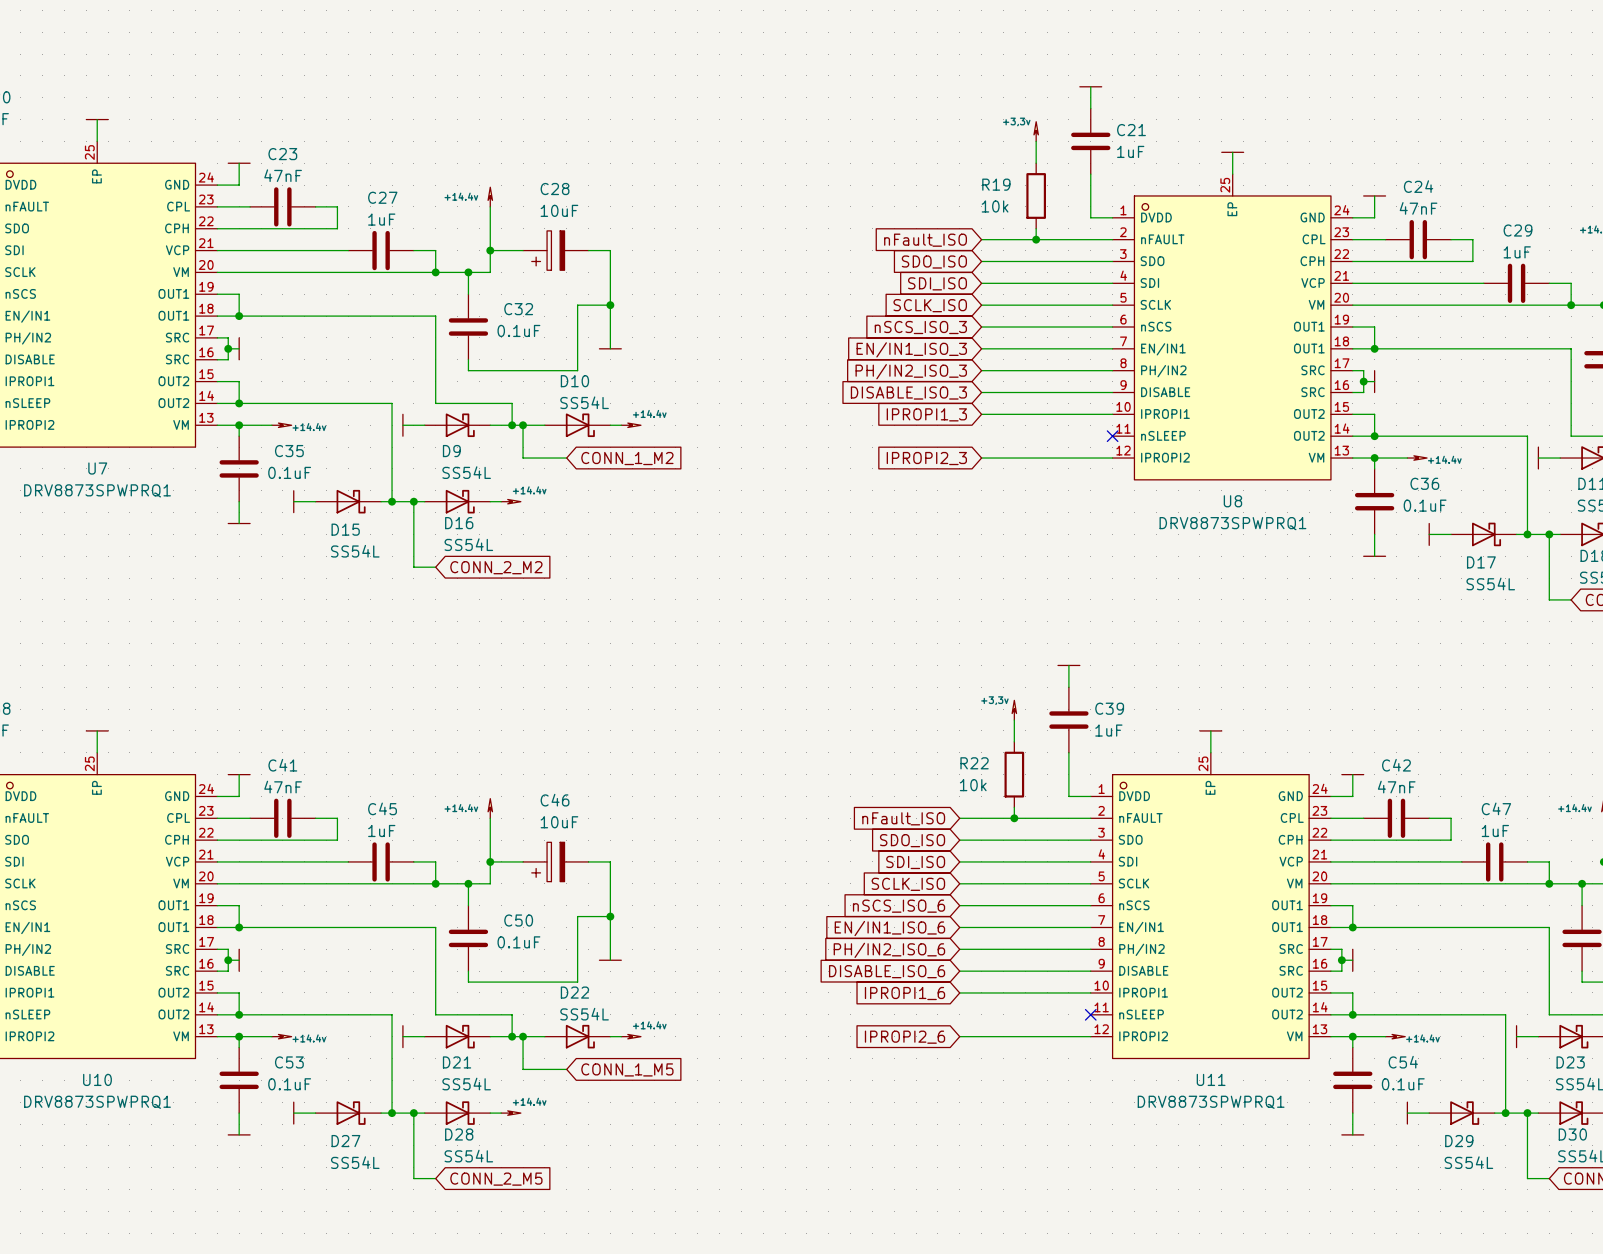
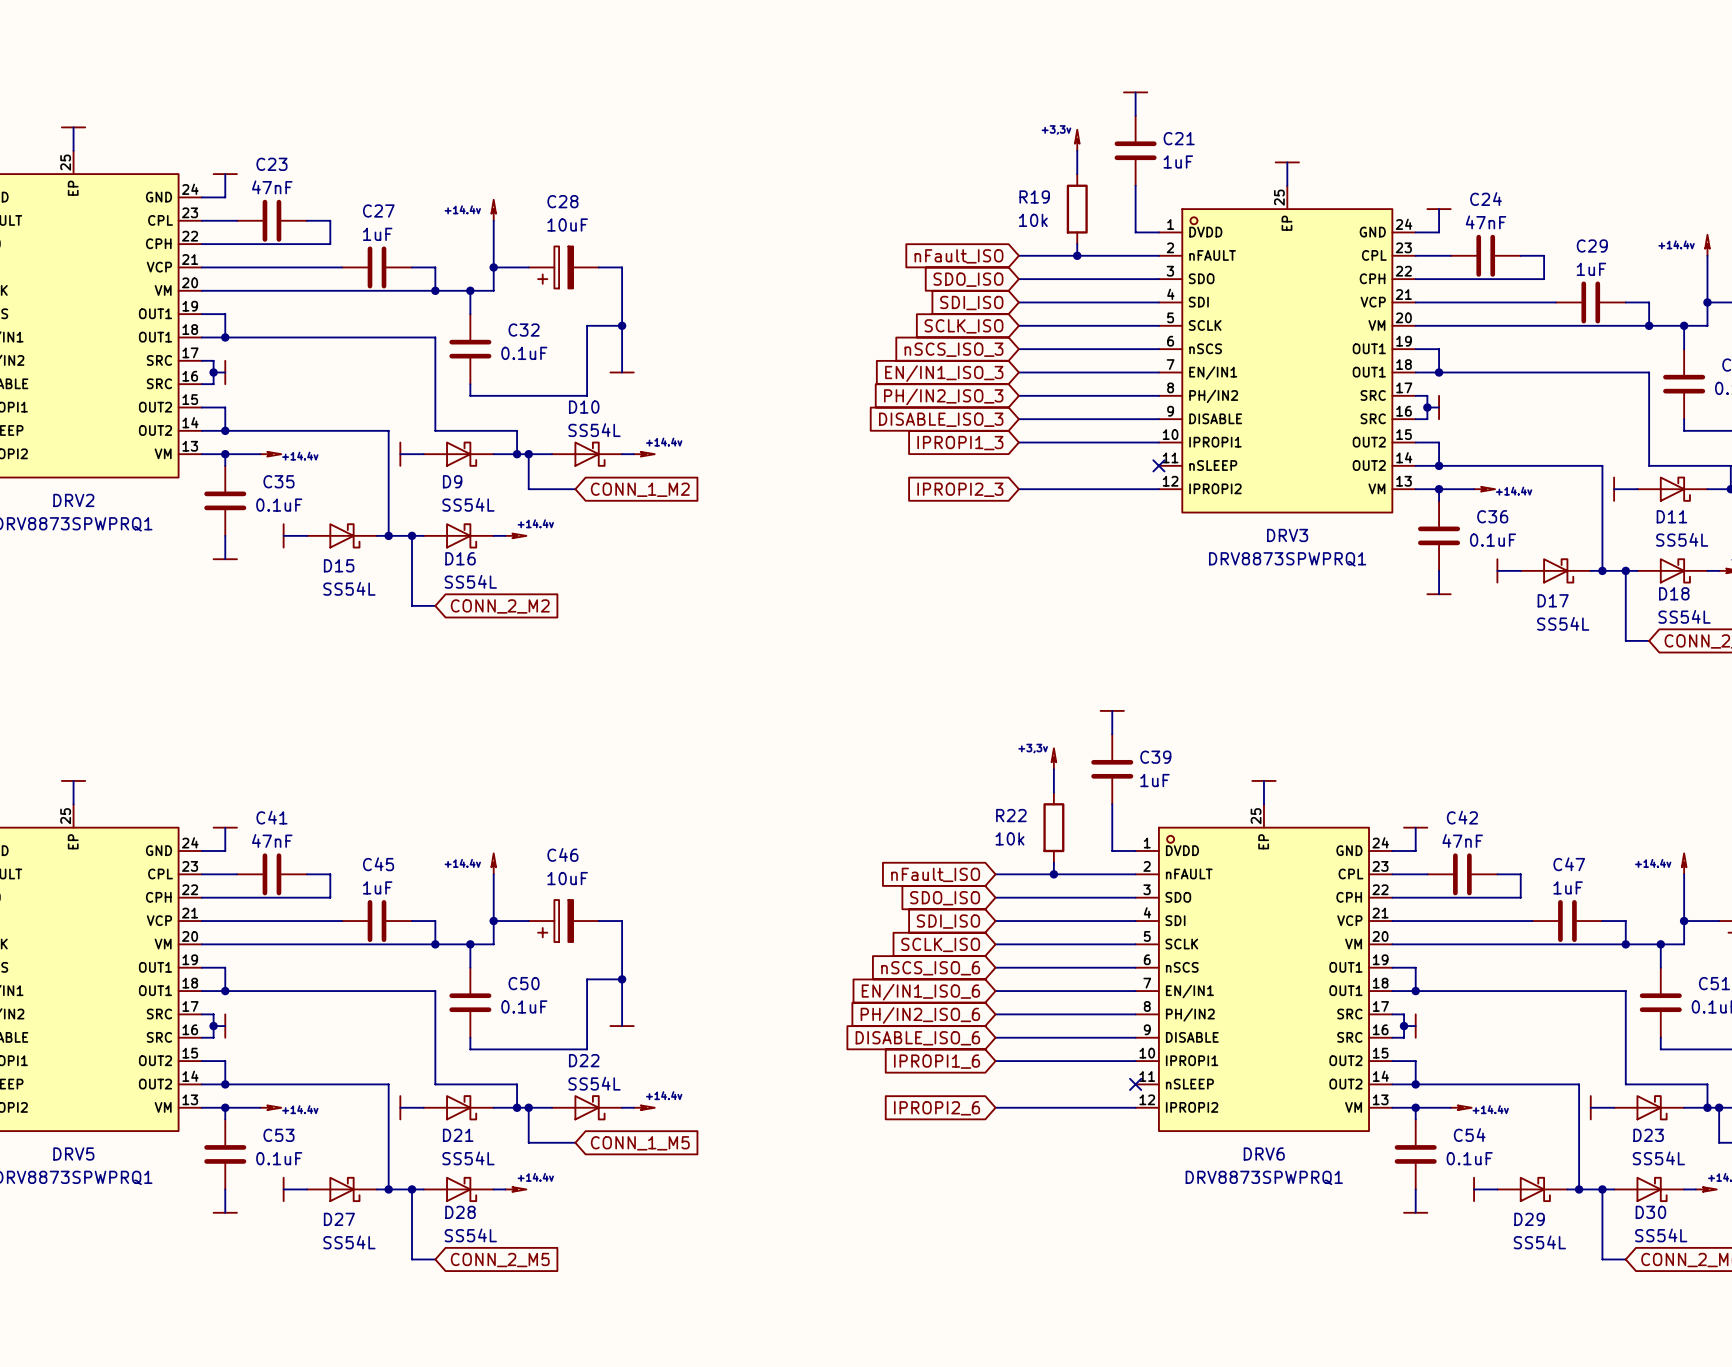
U7 name: U7 (97, 468) -> DRV2 (73, 500)
U8 name: U8 (1232, 501) -> DRV3 (1287, 535)
U10 name: U10 (97, 1079) -> DRV5 (73, 1154)
U11 name: U11 (1211, 1079) -> DRV6 (1264, 1154)

